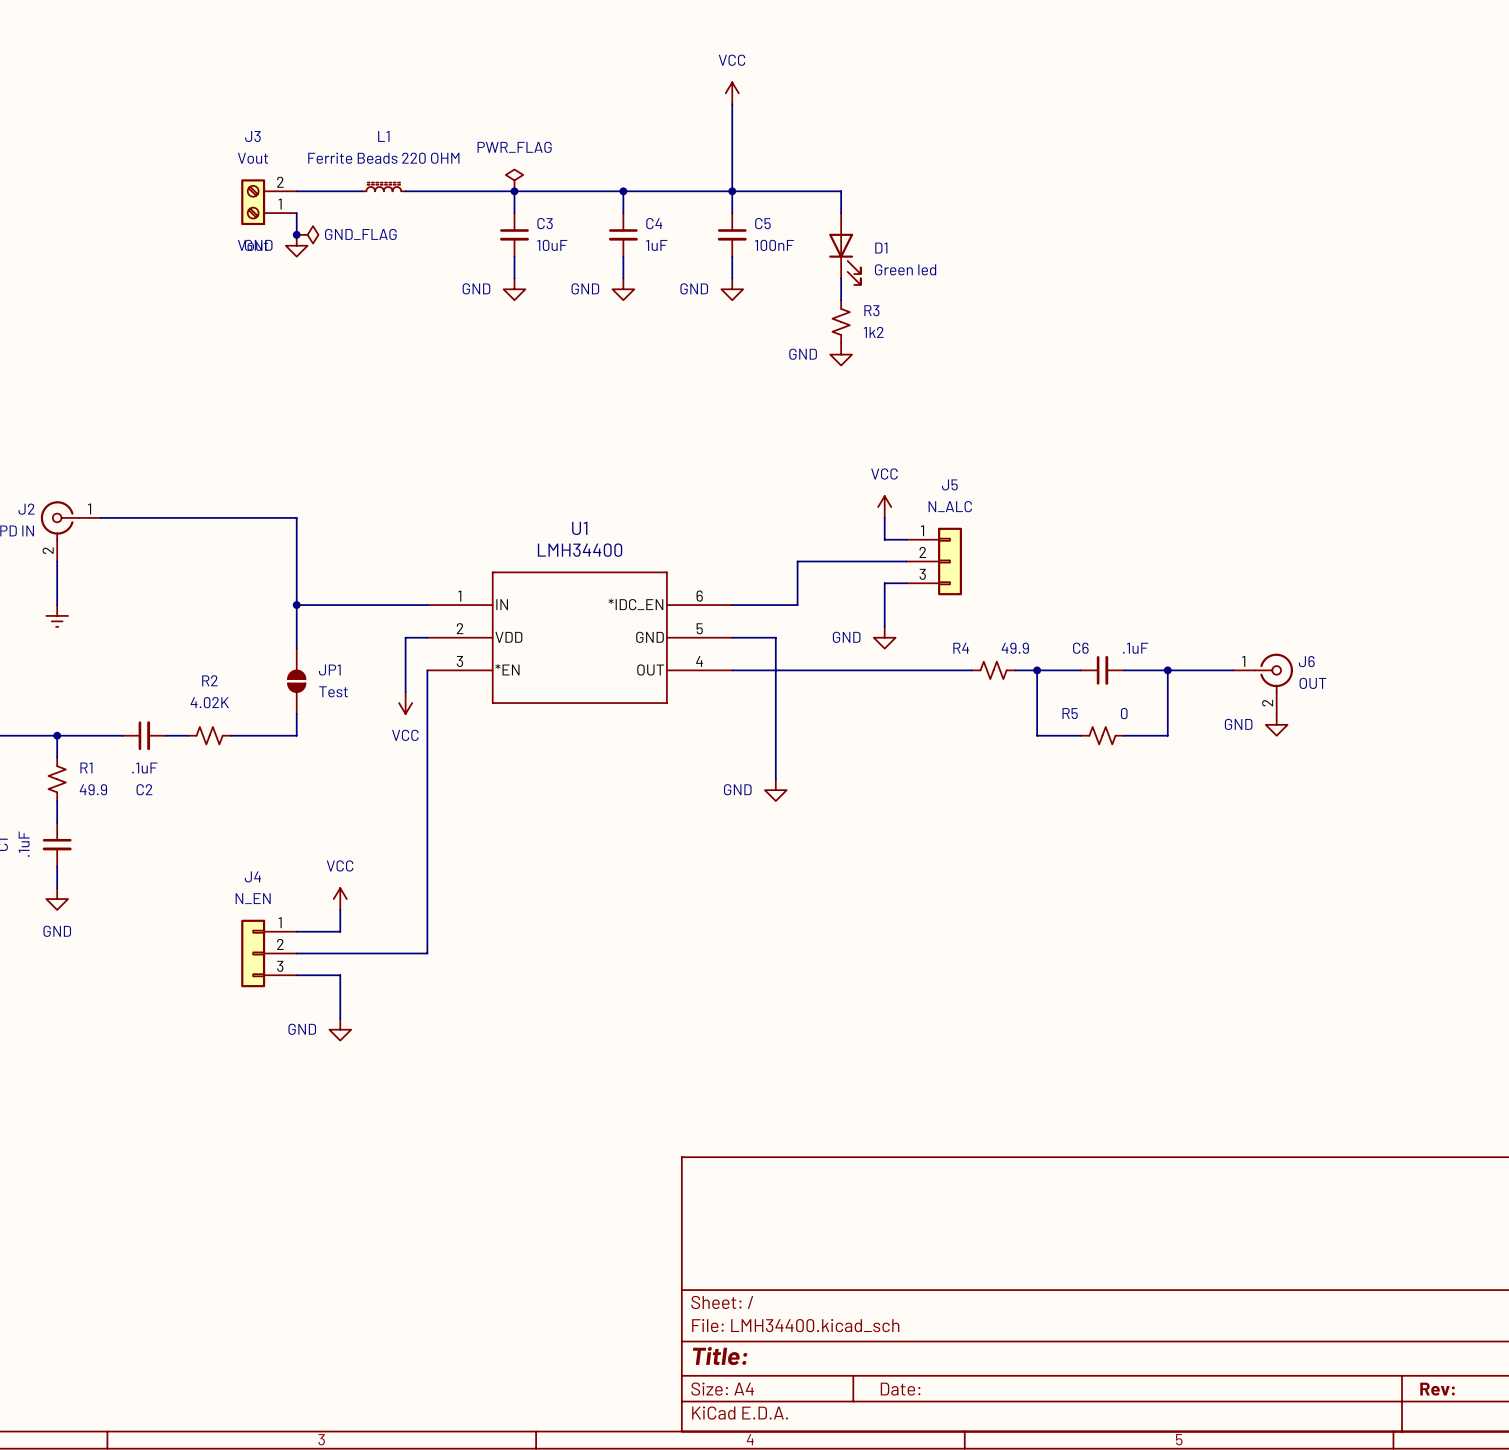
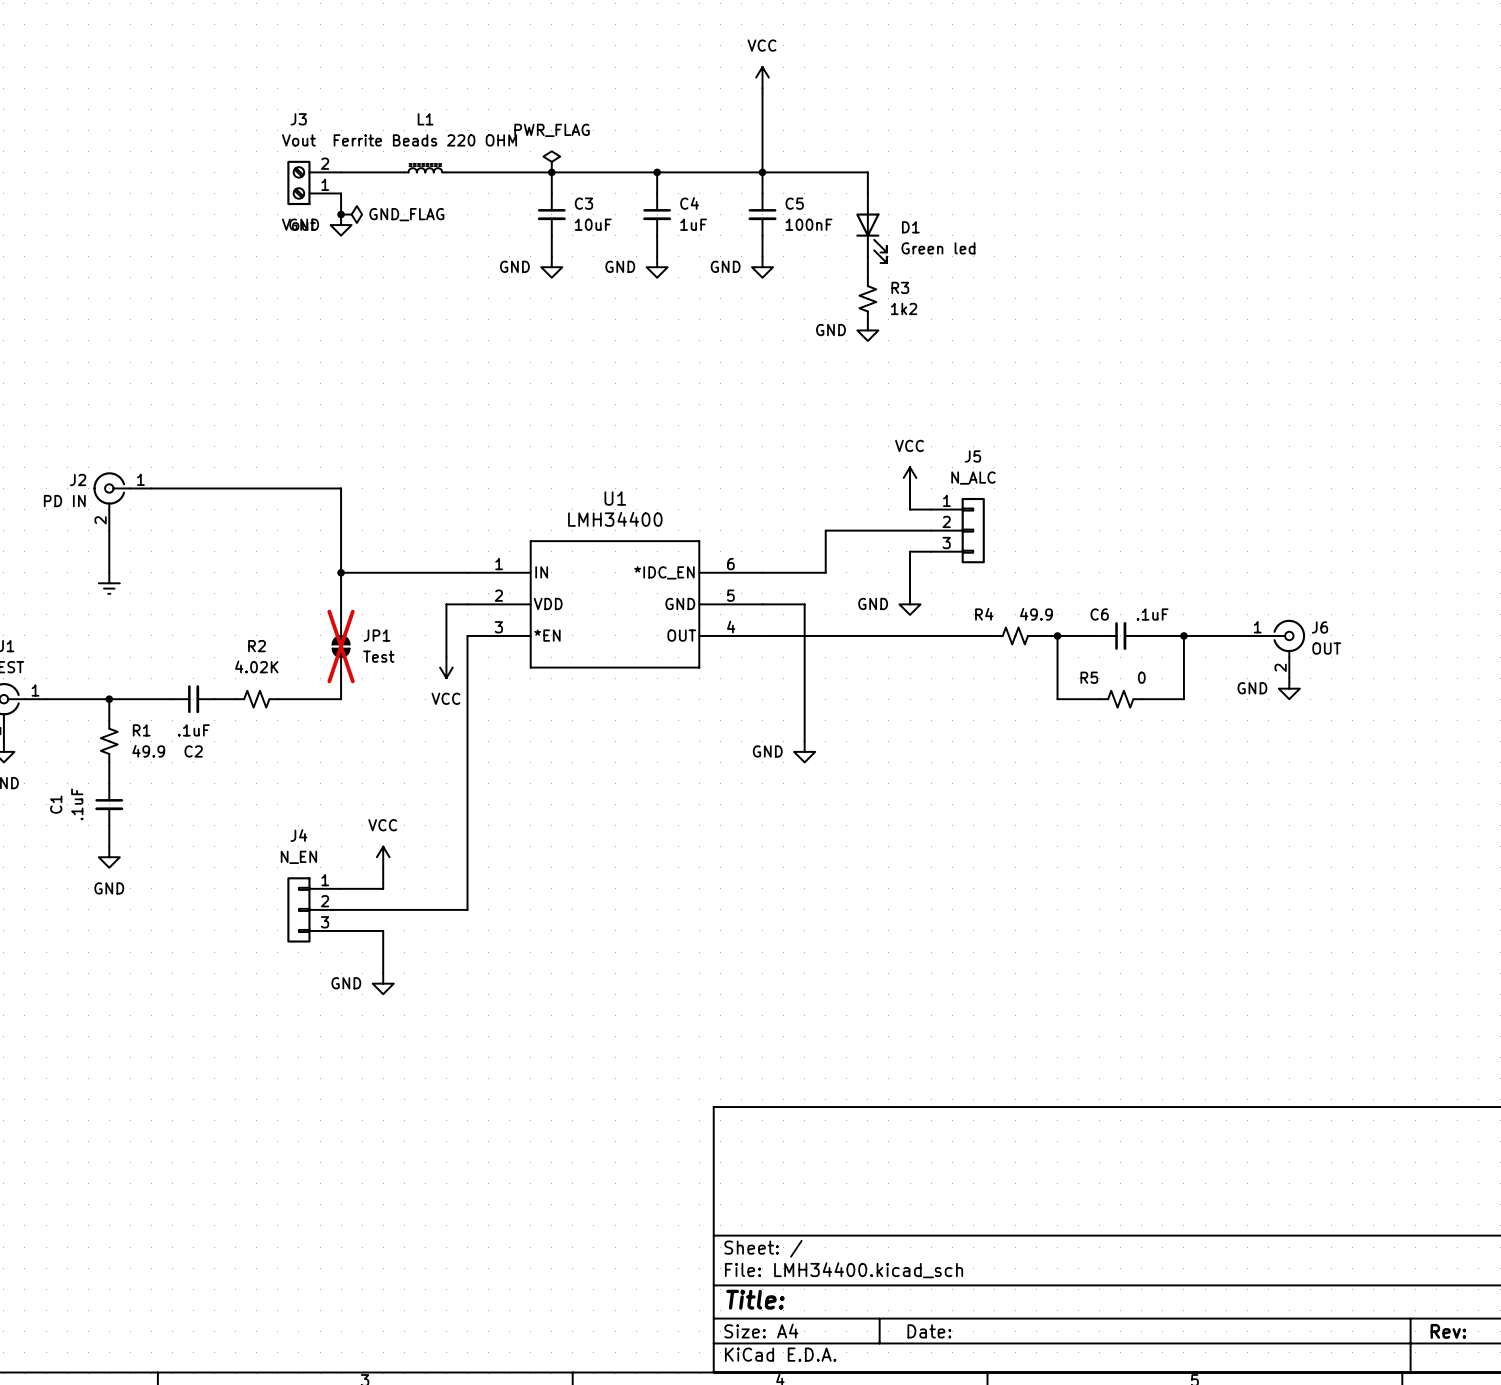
JP1 do-not-place cross: none -> (341, 646)

